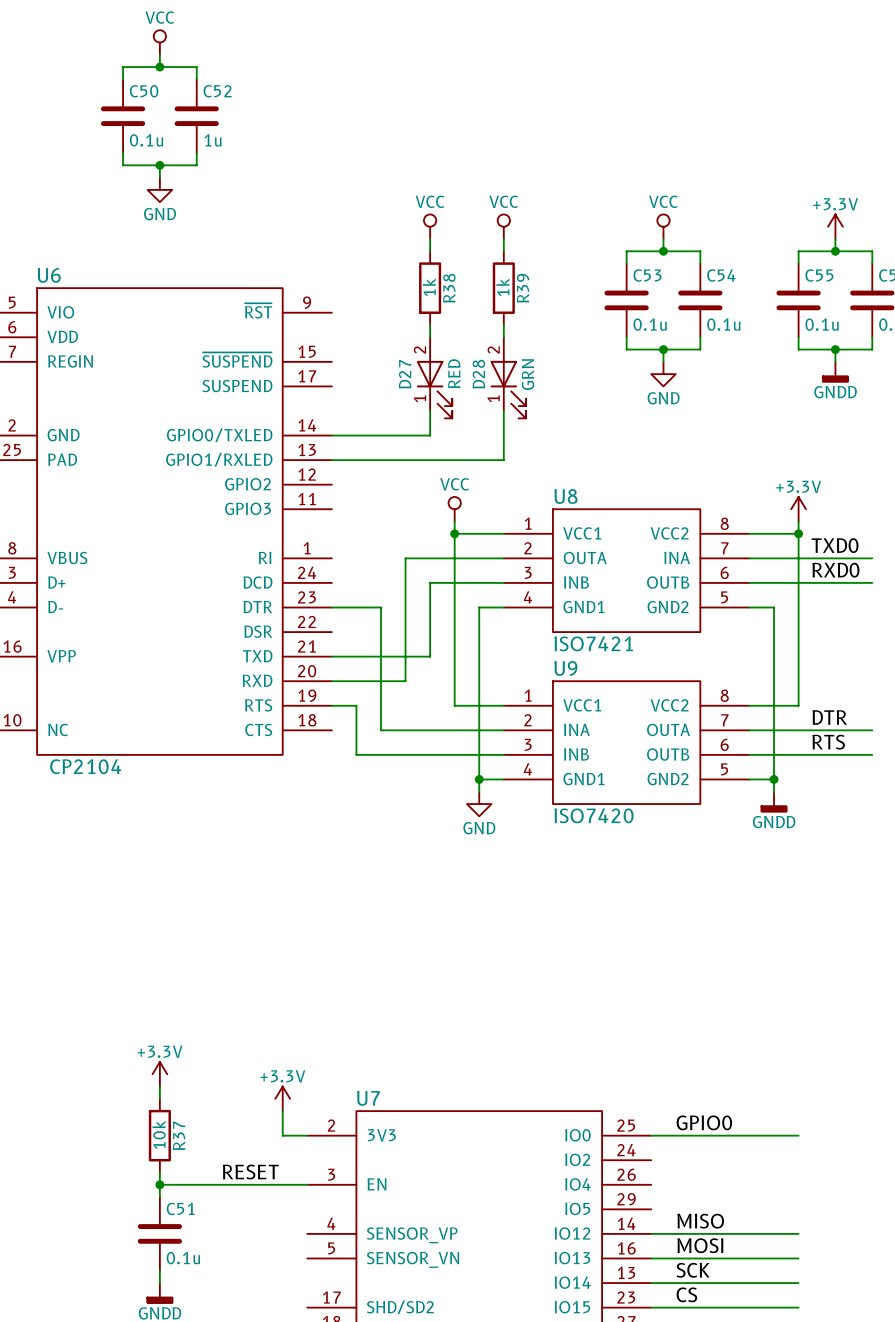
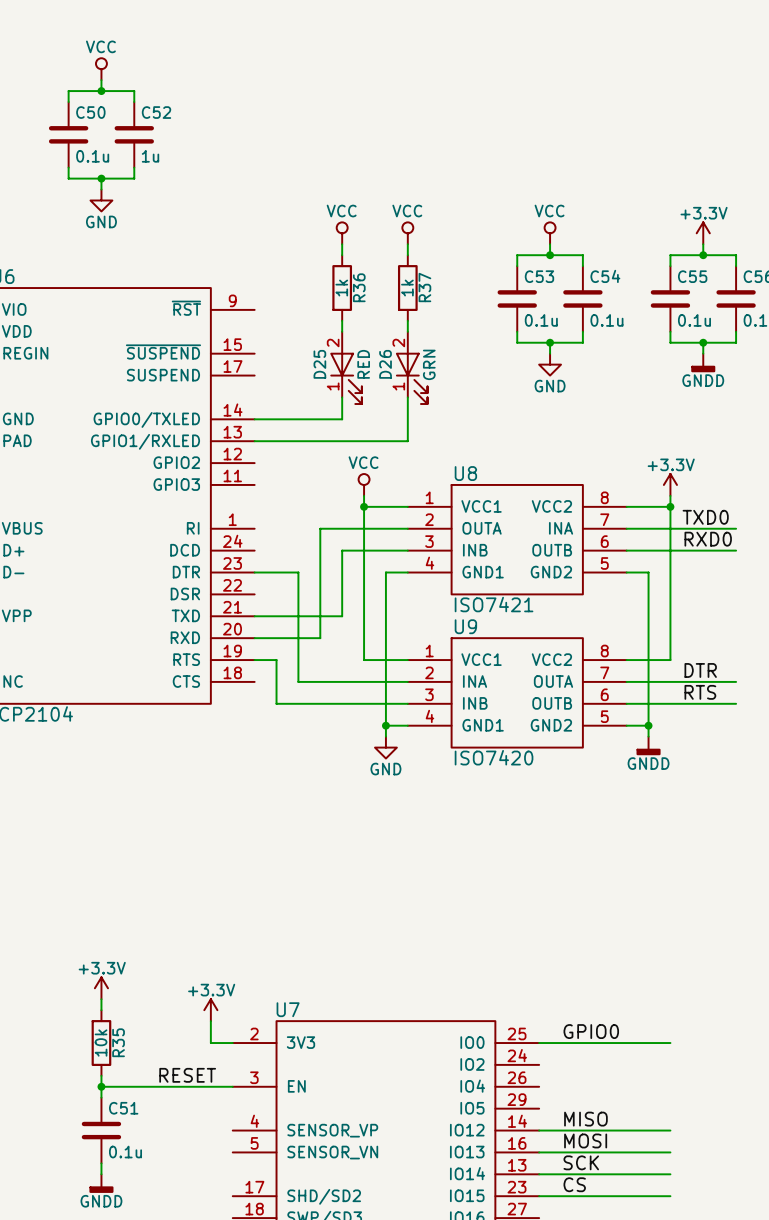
R38 name: R38 (449, 288) -> R36 (359, 287)
R39 name: R39 (523, 288) -> R37 (424, 287)
D27 name: D27 (405, 374) -> D25 (319, 364)
D28 name: D28 (478, 374) -> D26 (385, 364)
R37 name: R37 (179, 1135) -> R35 (118, 1042)

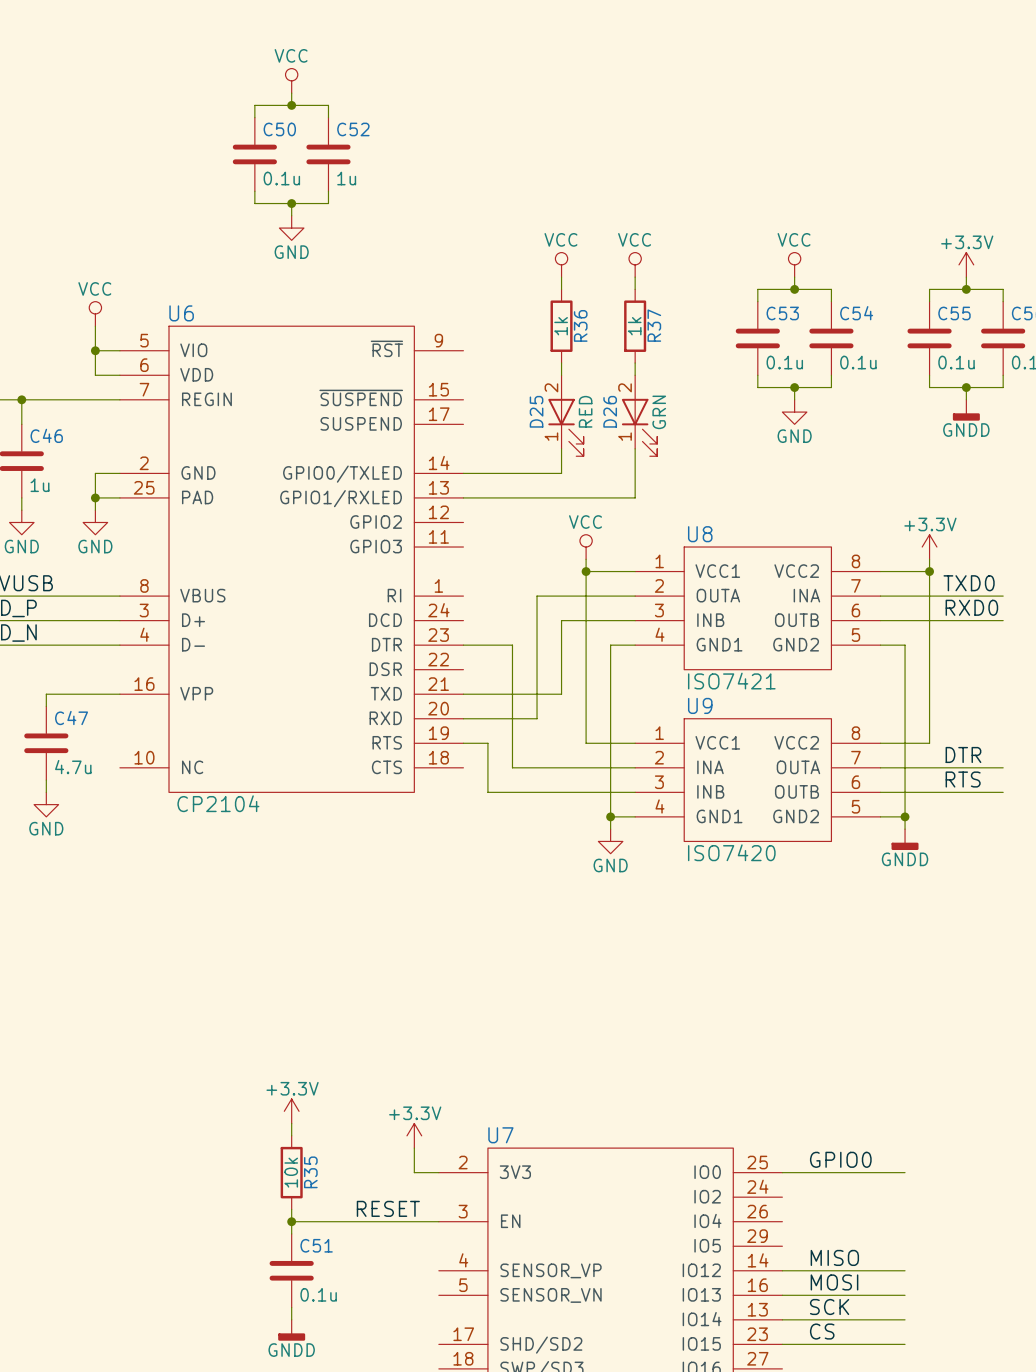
wire: (648, 1043) (670, 1043) -> none
wire: (648, 1130) (670, 1130) -> none
wire: (648, 1152) (670, 1152) -> none
wire: (648, 1174) (670, 1174) -> none
wire: (648, 1196) (670, 1196) -> none

